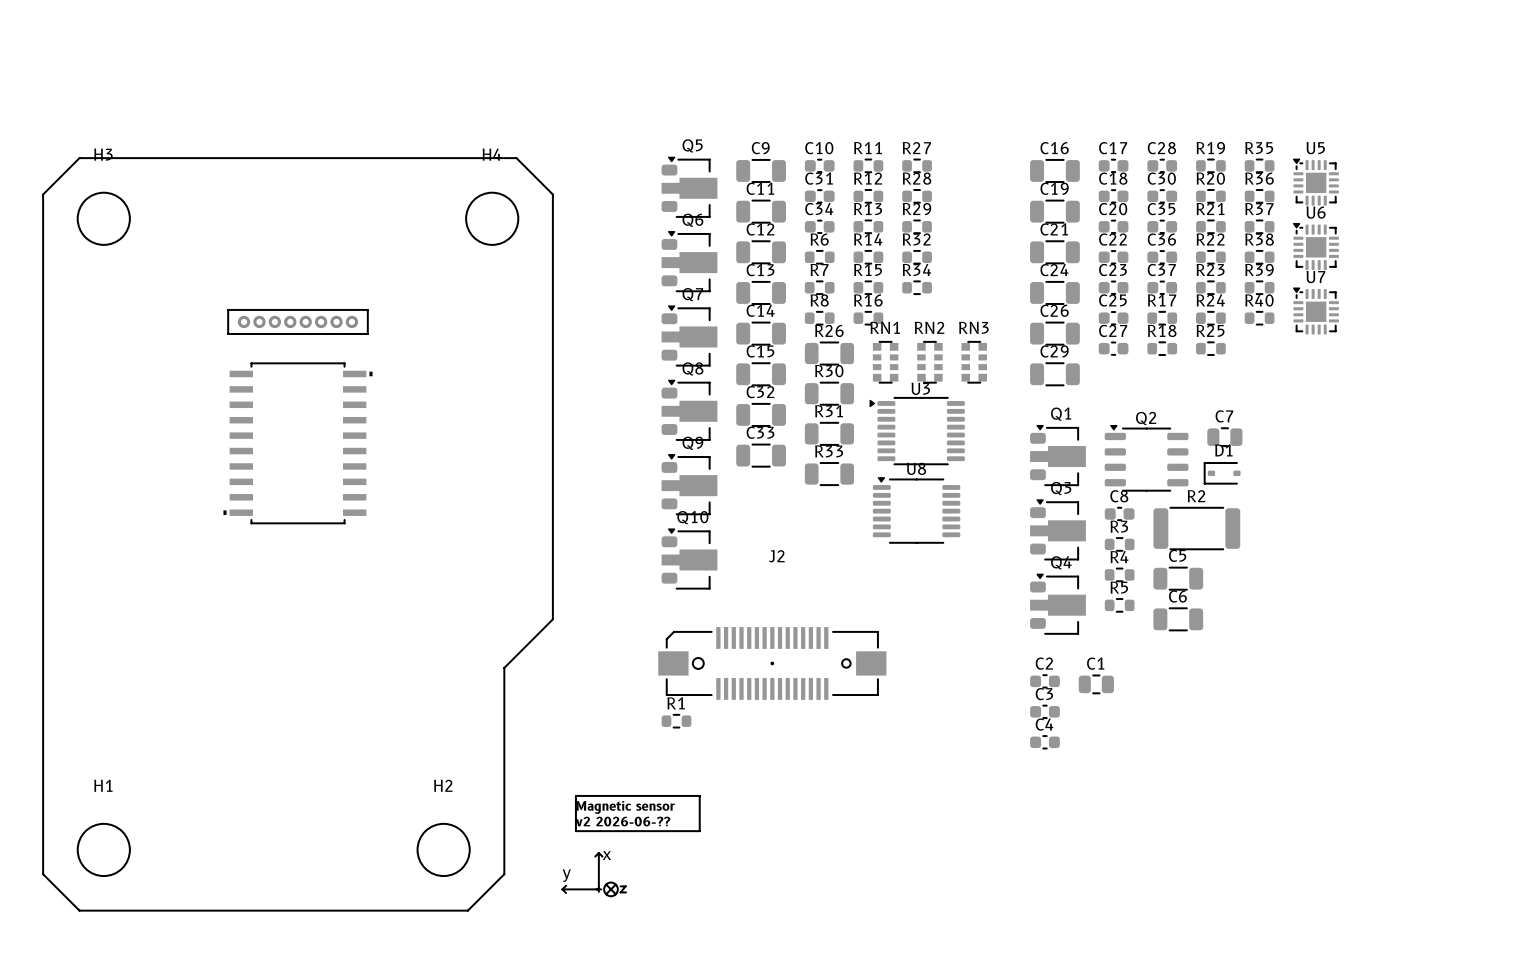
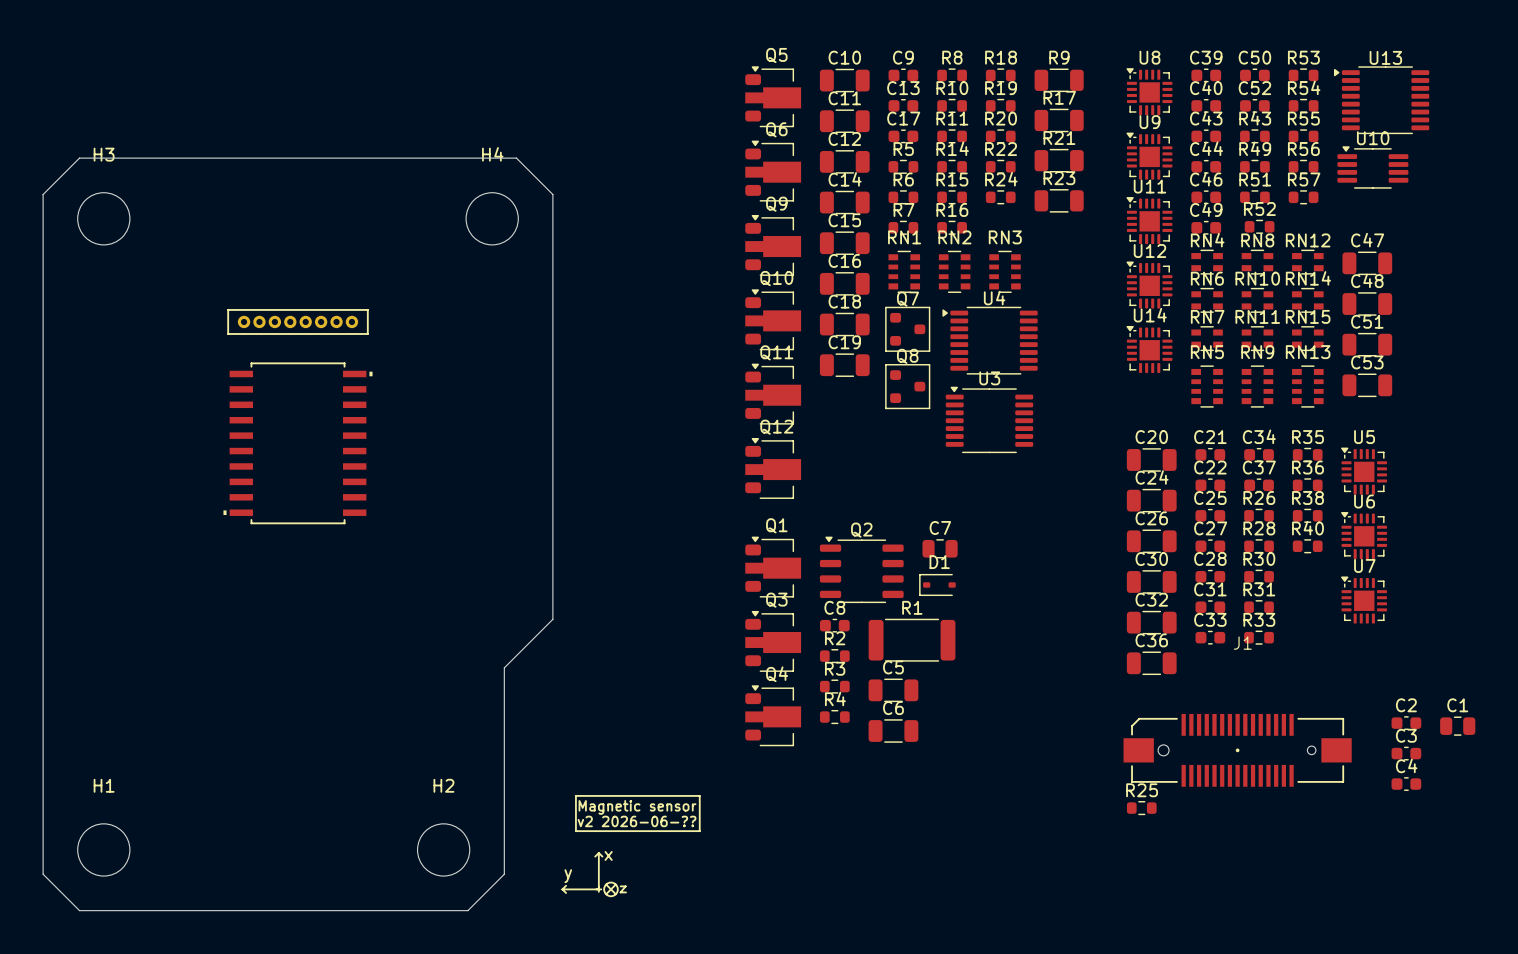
C39: none -> (1206, 75)
C50: none -> (1254, 75)
R53: none -> (1303, 75)
R9: none -> (1059, 80)
U13: none -> (1381, 100)
R10: none -> (952, 105)
C40: none -> (1206, 105)
C52: none -> (1254, 105)
R54: none -> (1303, 105)
C43: none -> (1206, 136)
R43: none -> (1254, 136)
R55: none -> (1303, 136)
U9: none -> (1149, 156)
C10 footprint: [804, 158, 835, 173] -> [819, 68, 870, 93]
C9 footprint: [736, 159, 786, 183] -> [888, 68, 919, 83]
R11 position: (868, 165) -> (952, 136)
R27: (917, 165) -> none
C17 position: (1113, 165) -> (903, 136)
C28 position: (1162, 165) -> (1210, 576)
R19 position: (1210, 165) -> (1000, 105)
R35 position: (1259, 165) -> (1307, 454)
C44: none -> (1206, 166)
R49: none -> (1254, 166)
R56: none -> (1303, 166)
U10: none -> (1372, 167)
C16 position: (1054, 170) -> (844, 283)
U5 position: (1315, 182) -> (1364, 471)
Q5 position: (689, 187) -> (773, 96)
C18 footprint: [1098, 189, 1129, 204] -> [819, 312, 870, 337]
C30 footprint: [1147, 189, 1178, 204] -> [1126, 570, 1177, 594]
C31 position: (819, 196) -> (1210, 607)
R12: (868, 196) -> none
R28 position: (917, 196) -> (1259, 546)
R20 position: (1210, 196) -> (1000, 136)
R36 position: (1259, 196) -> (1307, 485)
C46: none -> (1206, 197)
R51: none -> (1254, 197)
R57: none -> (1303, 197)
R37 name: R37 (1259, 209) -> R52 (1259, 209)
C11 position: (761, 211) -> (844, 121)
C19 position: (1054, 211) -> (844, 365)
C20 footprint: [1098, 219, 1129, 234] -> [1126, 448, 1177, 472]
R21 footprint: [1196, 219, 1226, 234] -> [1034, 148, 1084, 173]
U11: none -> (1149, 220)
C34 position: (819, 226) -> (1259, 454)
R13: (868, 226) -> none
R29: (917, 226) -> none
C35: (1162, 226) -> none
C49: none -> (1206, 227)
C21 footprint: [1030, 240, 1080, 265] -> [1195, 447, 1226, 462]
U6 position: (1315, 246) -> (1364, 535)
C36 footprint: [1147, 250, 1178, 265] -> [1126, 651, 1177, 676]
C12 position: (761, 252) -> (844, 161)
R6 position: (819, 257) -> (903, 197)
R14 position: (868, 257) -> (952, 166)
R32: (917, 257) -> none
C22 position: (1113, 257) -> (1210, 485)
R22 position: (1210, 257) -> (1000, 166)
R38 position: (1259, 257) -> (1307, 515)
Q6 position: (689, 261) -> (773, 171)
RN4: none -> (1207, 262)
RN8: none -> (1257, 262)
RN12: none -> (1307, 262)
C47: none -> (1367, 263)
R23 footprint: [1196, 280, 1226, 295] -> [1034, 189, 1084, 213]
C13 footprint: [736, 281, 786, 305] -> [888, 99, 919, 113]
U12: none -> (1149, 285)
R7 position: (819, 287) -> (903, 227)
R15 position: (868, 287) -> (952, 197)
R34: (917, 287) -> none
C23: (1113, 287) -> none
C37 position: (1162, 287) -> (1259, 485)
R39: (1259, 287) -> none
C24 position: (1054, 292) -> (1151, 500)
RN6: none -> (1207, 300)
RN10: none -> (1257, 300)
RN14: none -> (1307, 300)
C48: none -> (1367, 304)
Q7 footprint: [661, 305, 718, 367] -> [885, 306, 931, 352]
R17 footprint: [1147, 311, 1178, 326] -> [1034, 108, 1084, 133]
U7 position: (1315, 311) -> (1364, 600)
R8 position: (819, 318) -> (952, 75)
R16 position: (868, 318) -> (952, 227)
C25 position: (1113, 318) -> (1210, 515)
R24 position: (1210, 318) -> (1000, 197)
R40 position: (1259, 318) -> (1307, 546)
C14 position: (761, 333) -> (844, 202)
C26 position: (1054, 333) -> (1151, 541)
RN7: none -> (1207, 338)
RN11: none -> (1257, 338)
RN15: none -> (1307, 338)
U4: none -> (990, 340)
R26 footprint: [804, 341, 855, 366] -> [1244, 508, 1274, 523]
RN1 footprint: [872, 341, 899, 384] -> [888, 250, 921, 293]
RN2 footprint: [917, 341, 943, 384] -> [938, 250, 971, 293]
RN3 footprint: [961, 341, 987, 384] -> [989, 250, 1021, 293]
C51: none -> (1367, 344)
C27 position: (1113, 348) -> (1210, 546)
R18 position: (1162, 348) -> (1000, 75)
R25 position: (1210, 348) -> (1141, 808)
U14: none -> (1149, 349)
C15 position: (761, 374) -> (844, 243)
C29: (1054, 374) -> none
Q8 footprint: [661, 379, 718, 441] -> [885, 364, 931, 410]
R30 footprint: [804, 381, 855, 406] -> [1244, 569, 1274, 584]
C53: none -> (1367, 385)
RN5: none -> (1207, 386)
RN9: none -> (1257, 386)
RN13: none -> (1307, 386)
Q11: none -> (773, 394)
U3 footprint: [869, 397, 965, 466] -> [945, 386, 1034, 454]
C32 position: (761, 414) -> (1151, 622)
R31 footprint: [804, 422, 855, 446] -> [1244, 600, 1274, 615]
C7 position: (1224, 437) -> (940, 548)
C33 footprint: [736, 443, 786, 468] -> [1195, 630, 1226, 645]
Q1 position: (1057, 455) -> (773, 567)
Q2 position: (1146, 458) -> (861, 569)
R33 footprint: [804, 462, 855, 486] -> [1244, 630, 1274, 645]
Q12: none -> (773, 468)
D1 position: (1222, 473) -> (937, 584)
U8 footprint: [872, 477, 961, 544] -> [1126, 68, 1173, 116]
Q9 position: (689, 484) -> (773, 245)
R2 footprint: [1153, 507, 1241, 551] -> [819, 649, 850, 664]
C8 position: (1119, 513) -> (834, 625)
Q3 position: (1057, 529) -> (773, 641)
R3 position: (1119, 544) -> (834, 686)
Q10 position: (689, 558) -> (773, 319)
R4 position: (1119, 574) -> (834, 717)
C5 position: (1178, 578) -> (893, 690)
Q4 position: (1057, 604) -> (773, 715)
R5 position: (1119, 605) -> (903, 166)
C6 position: (1178, 619) -> (893, 731)
J2: (772, 663) -> none
C2 position: (1045, 681) -> (1406, 723)
C1 position: (1096, 684) -> (1457, 726)
C3 position: (1045, 711) -> (1406, 753)
R1 footprint: [661, 714, 692, 729] -> [868, 618, 956, 662]
C4 position: (1045, 742) -> (1406, 784)
J1: none -> (1237, 750)

